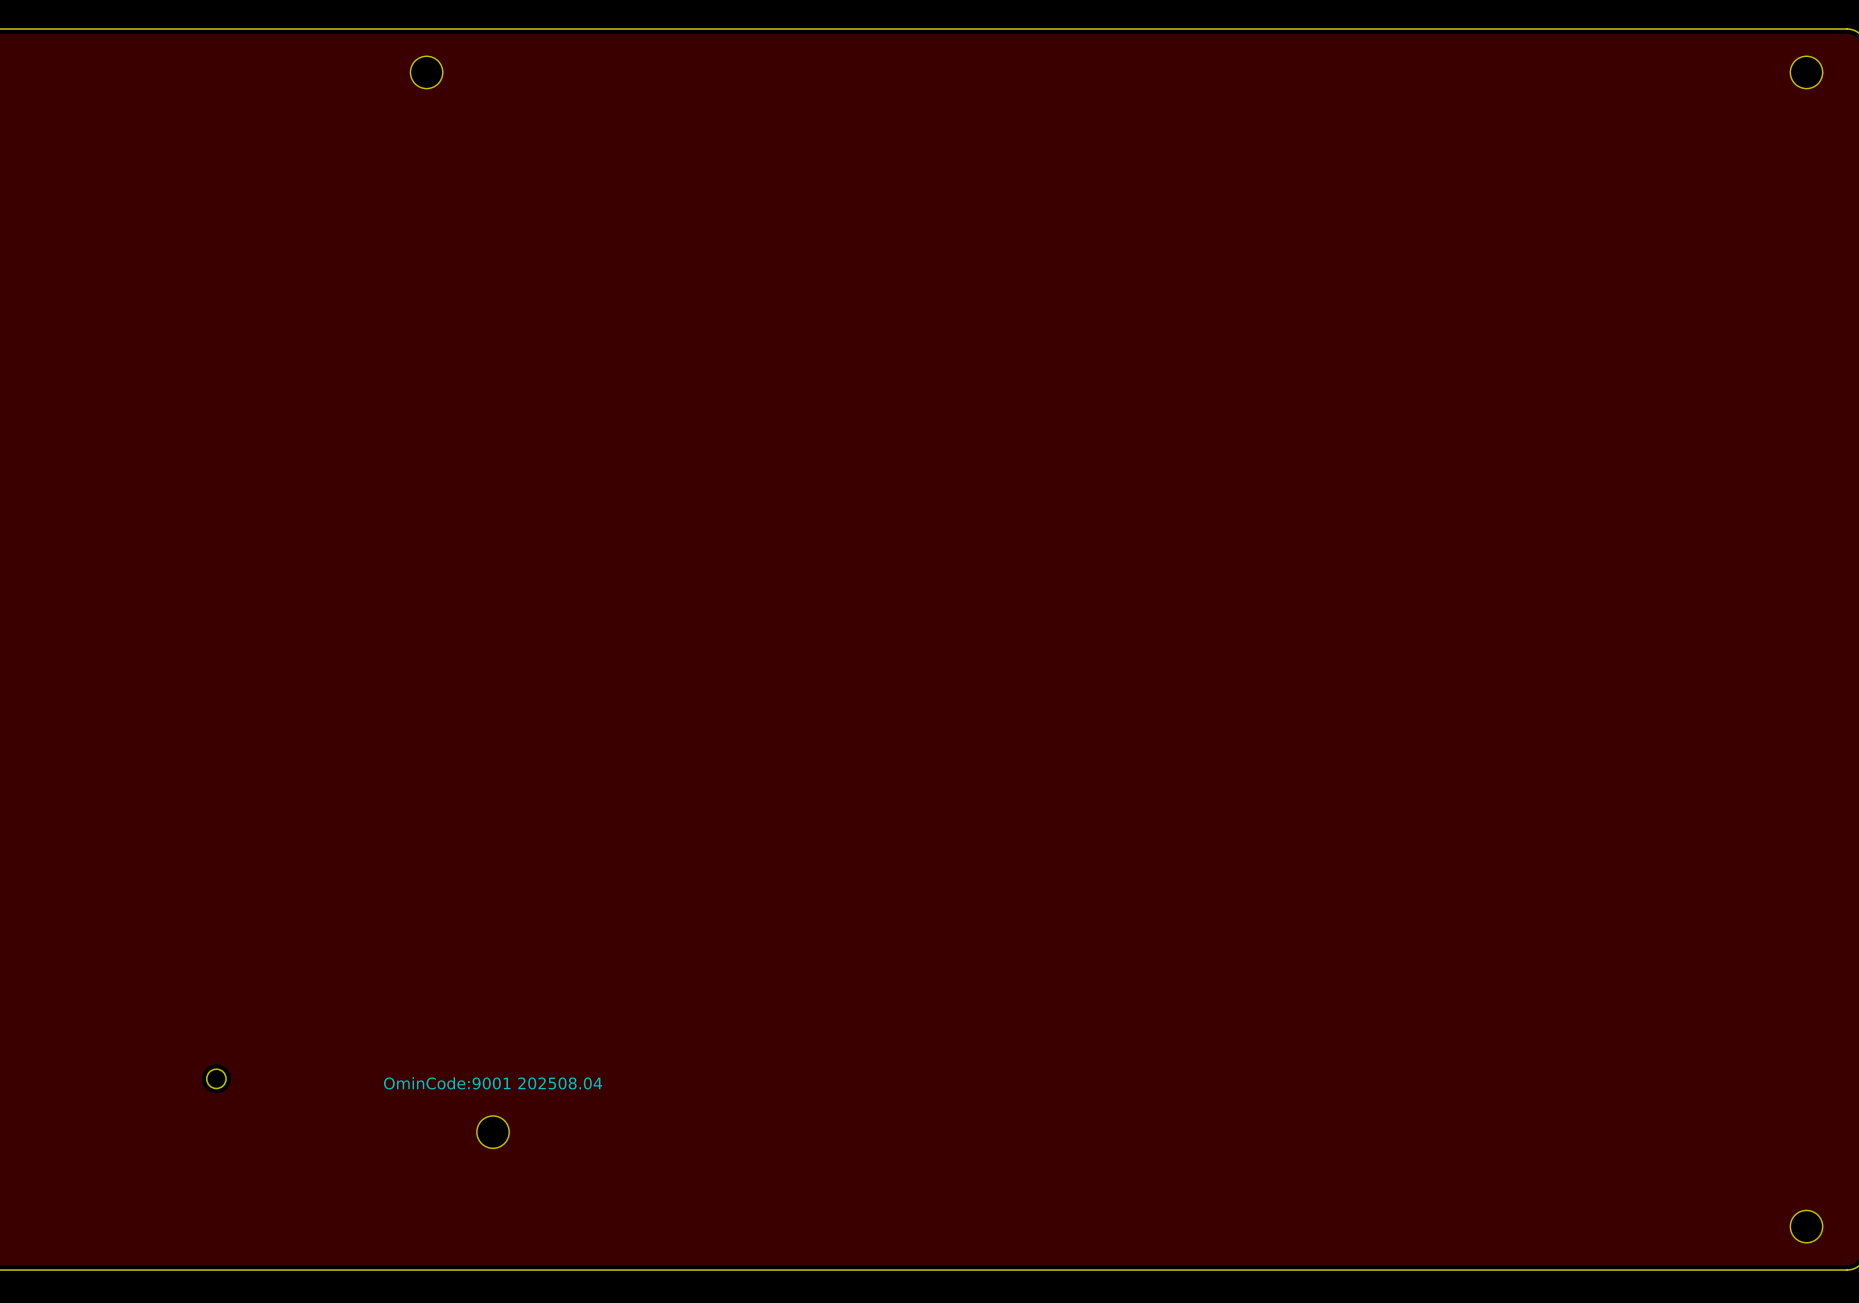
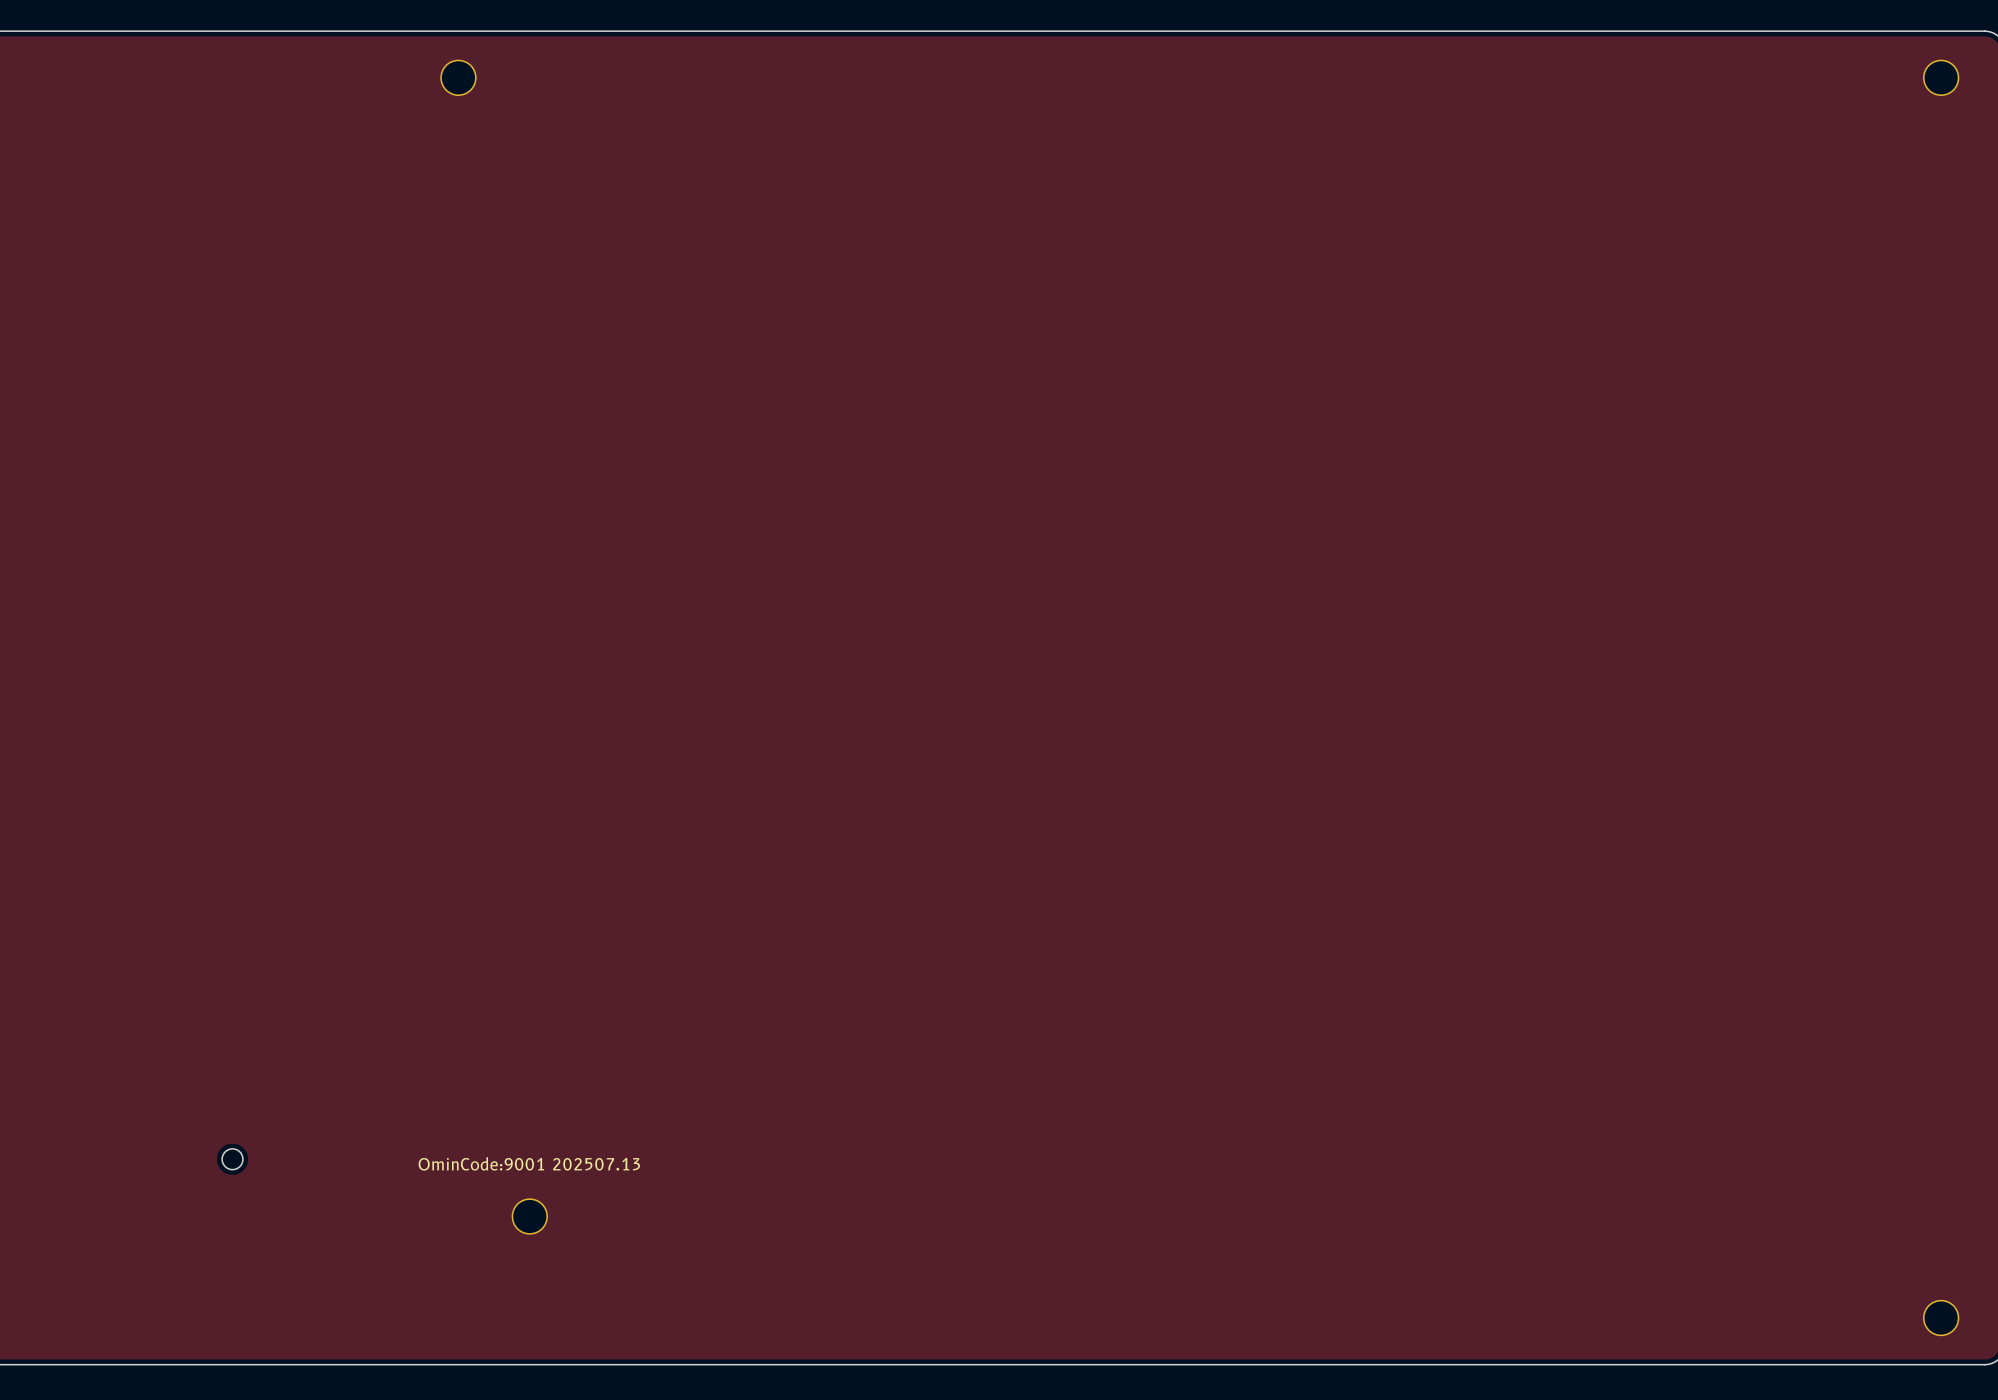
text: OminCode:9001 202508.04 (493, 1083) -> OminCode:9001 202507.13 (529, 1163)

